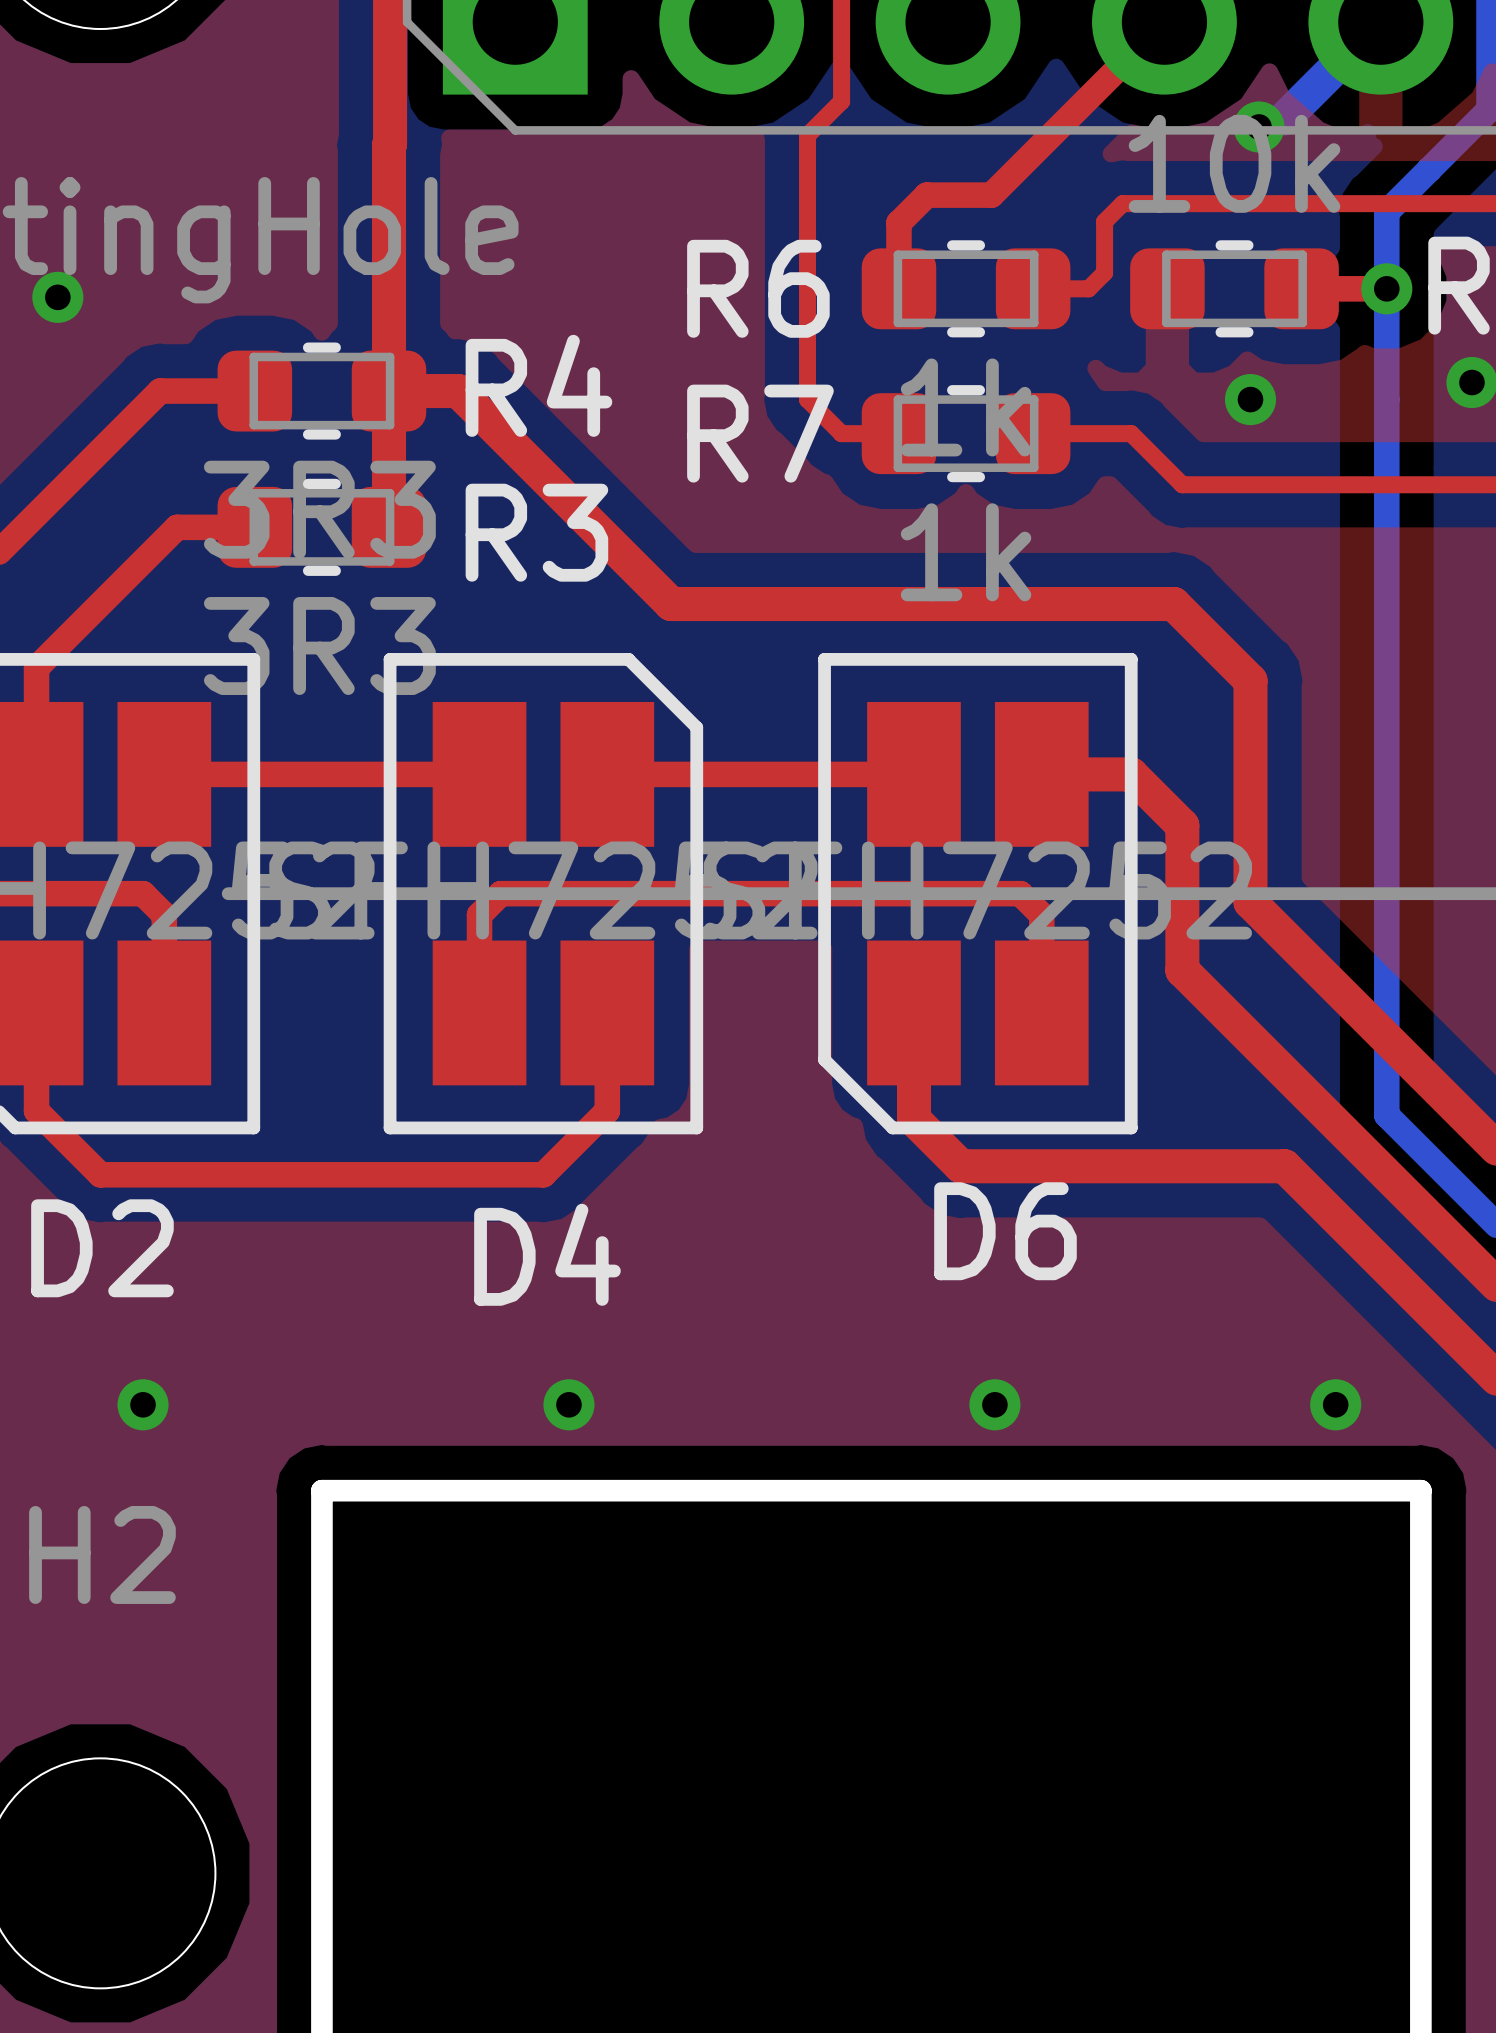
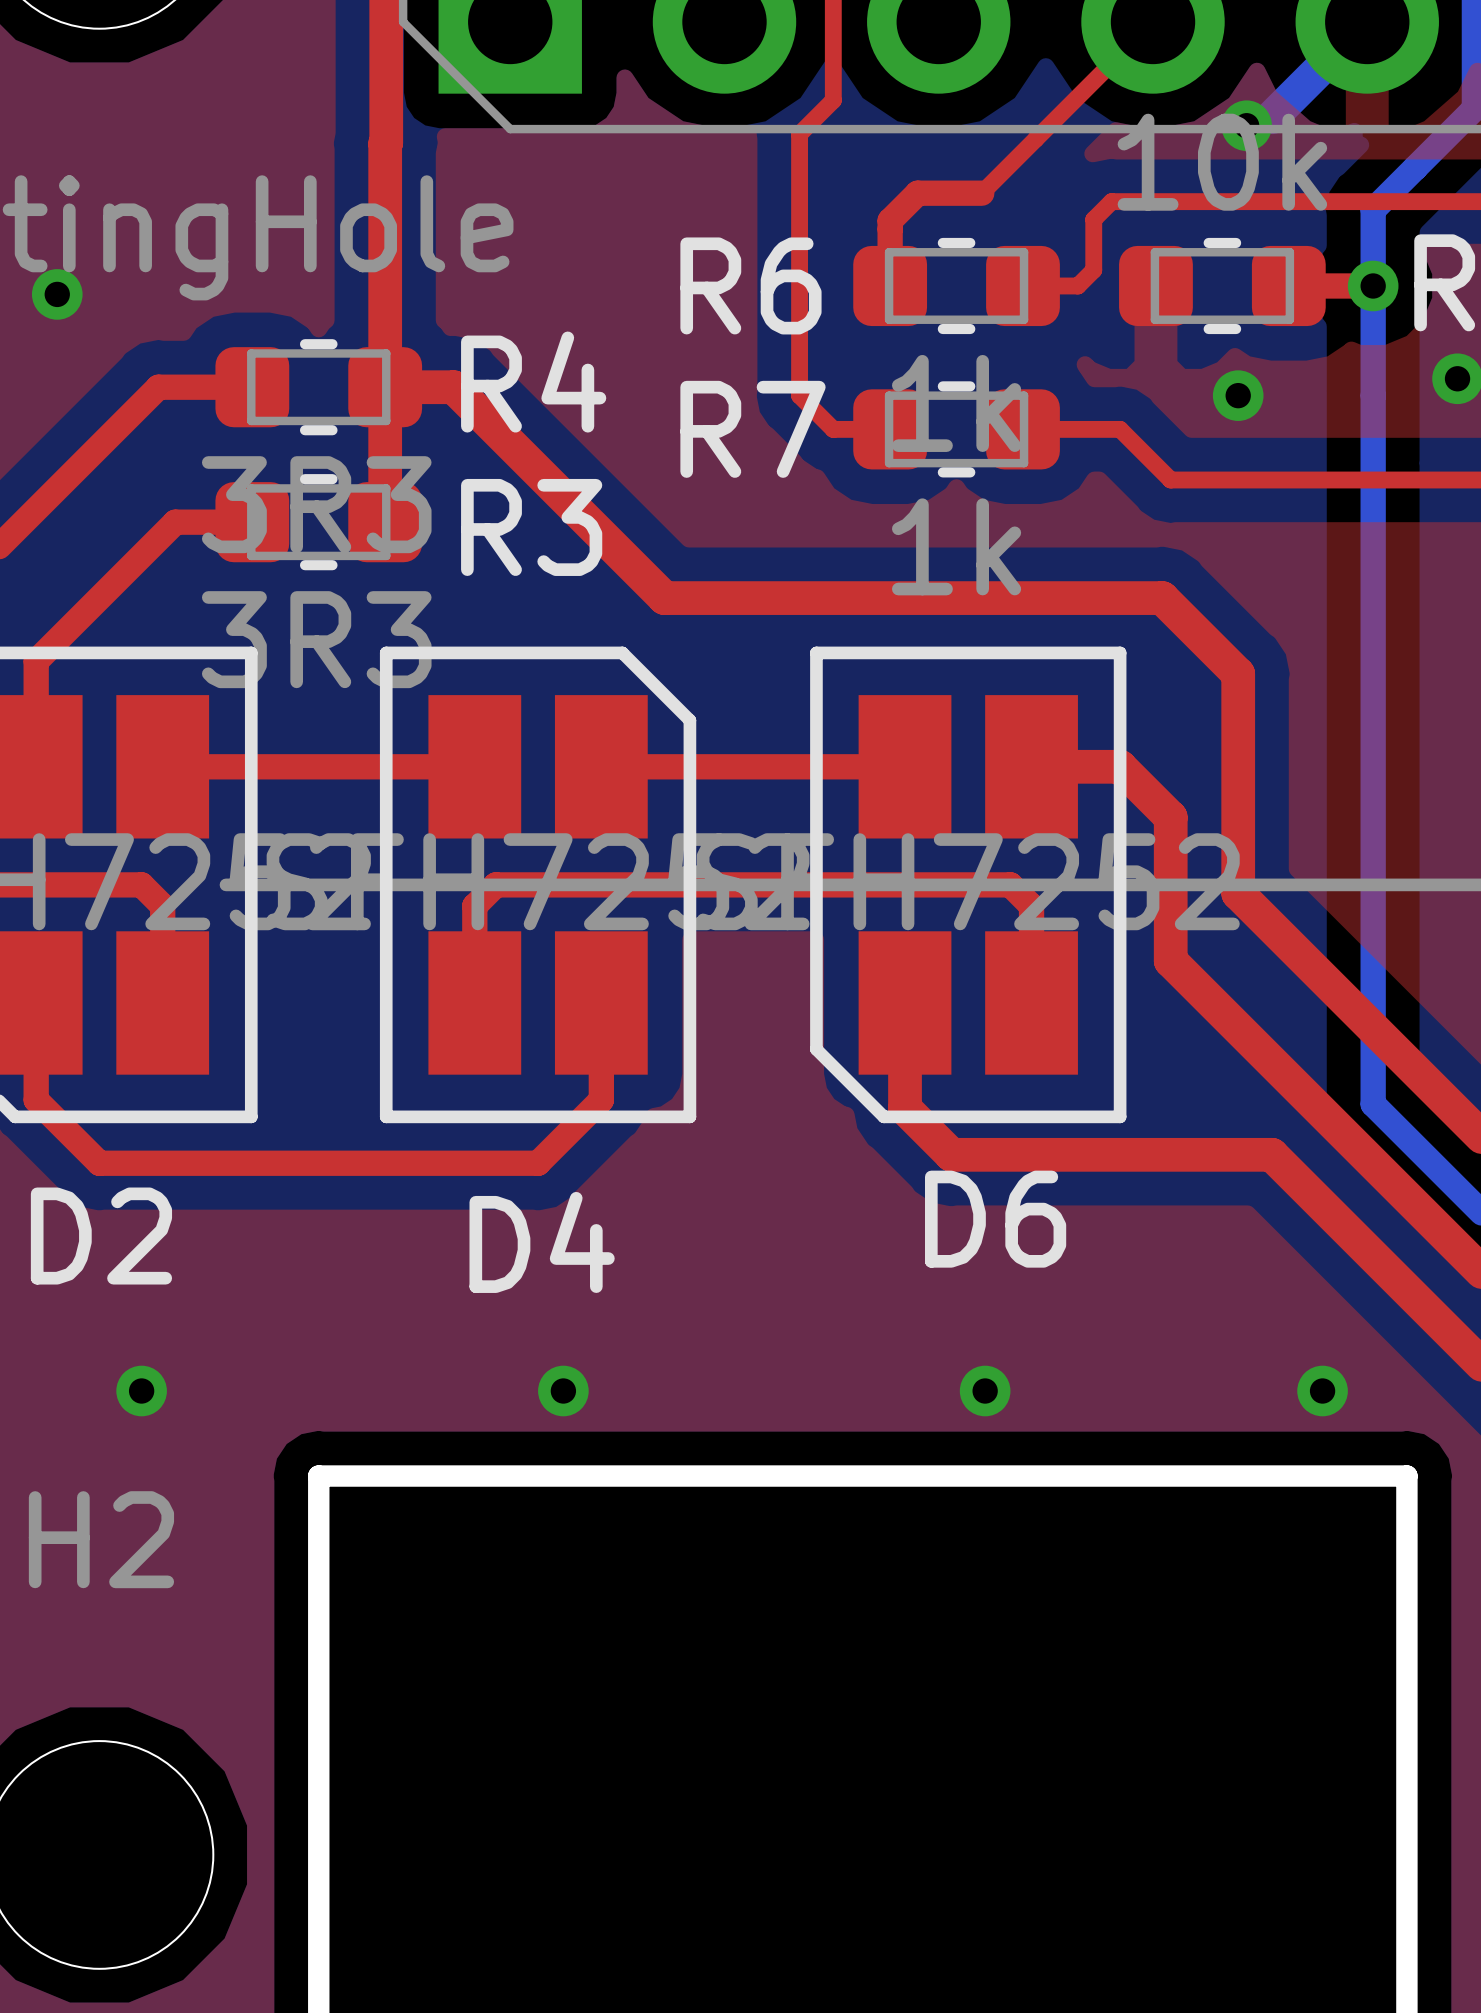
top track width: thick (1164, 22) (991, 195) -> thin (1153, 21) (981, 193)

